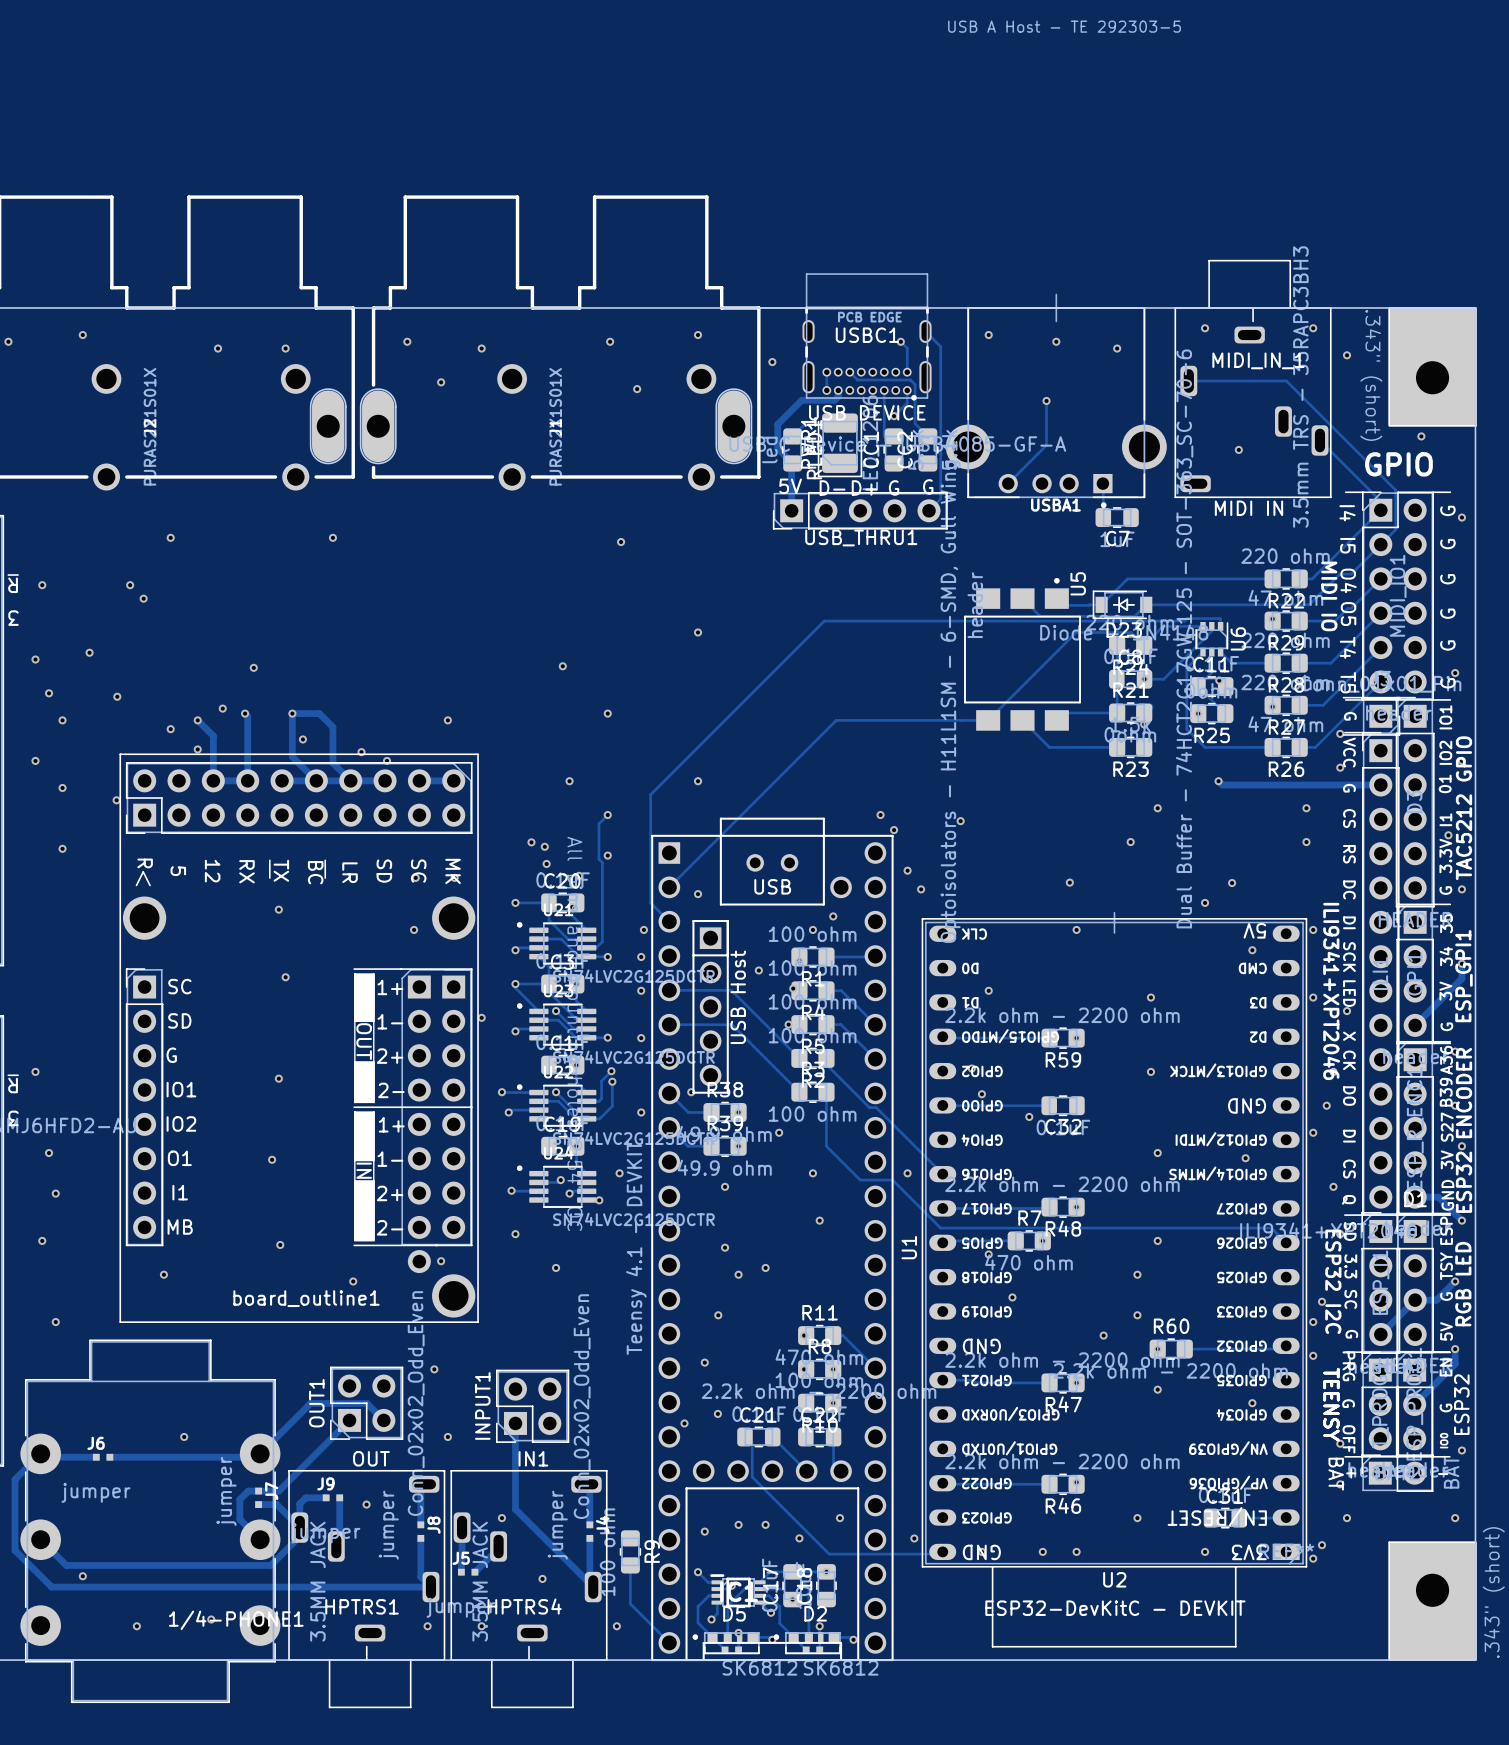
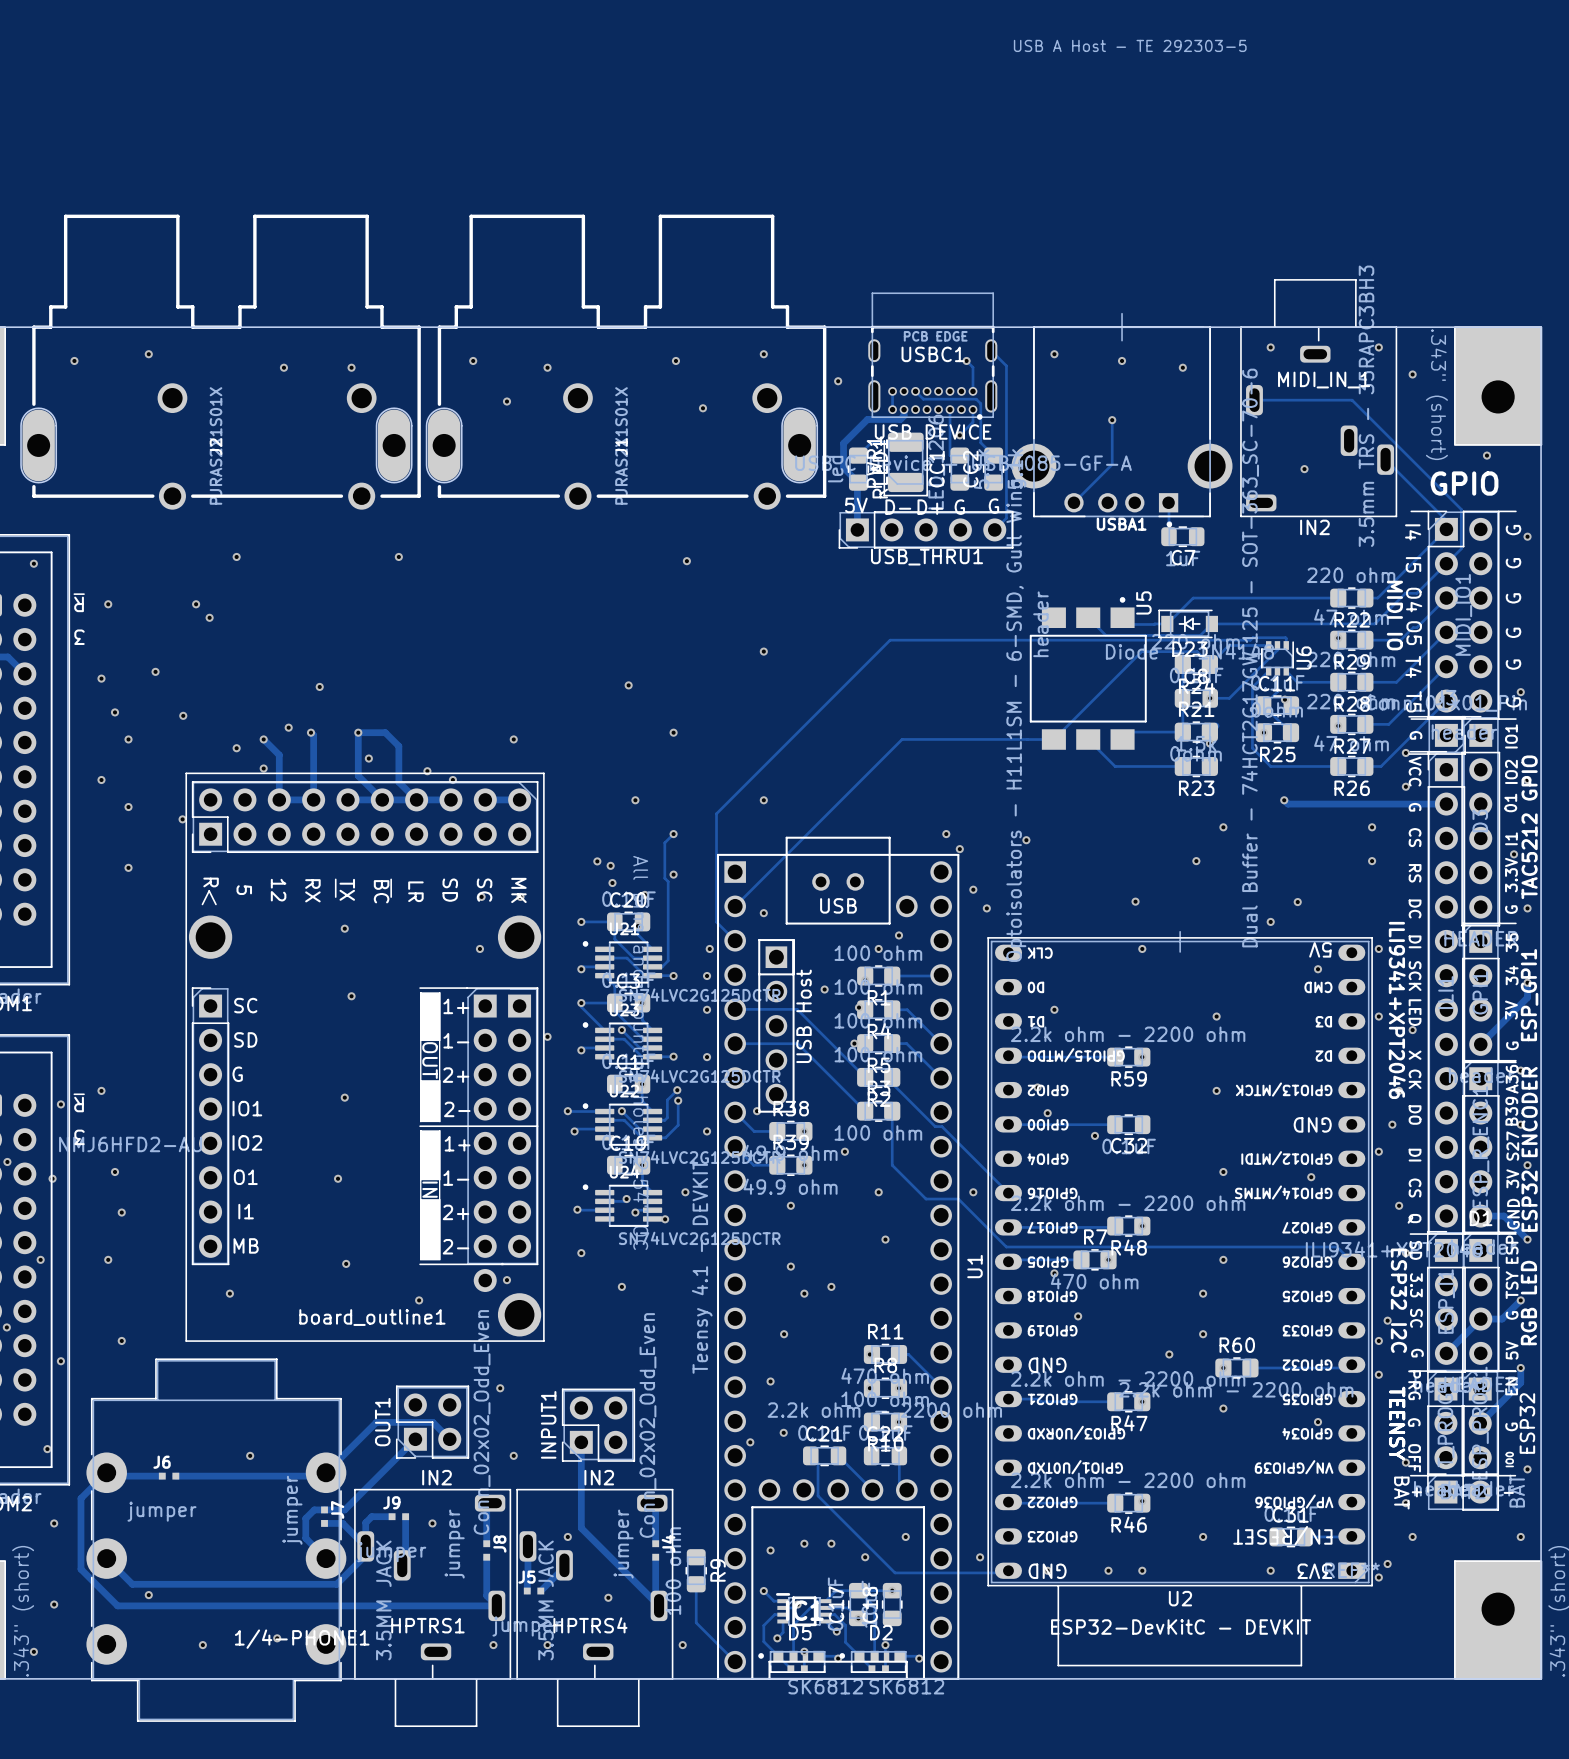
MIDI_IN_1 text: MIDI IN (1248, 508) -> IN2 (1314, 527)
HPTRS1 text: OUT (371, 1458) -> IN2 (437, 1477)
HPTRS4 text: IN1 (533, 1458) -> IN2 (599, 1477)

